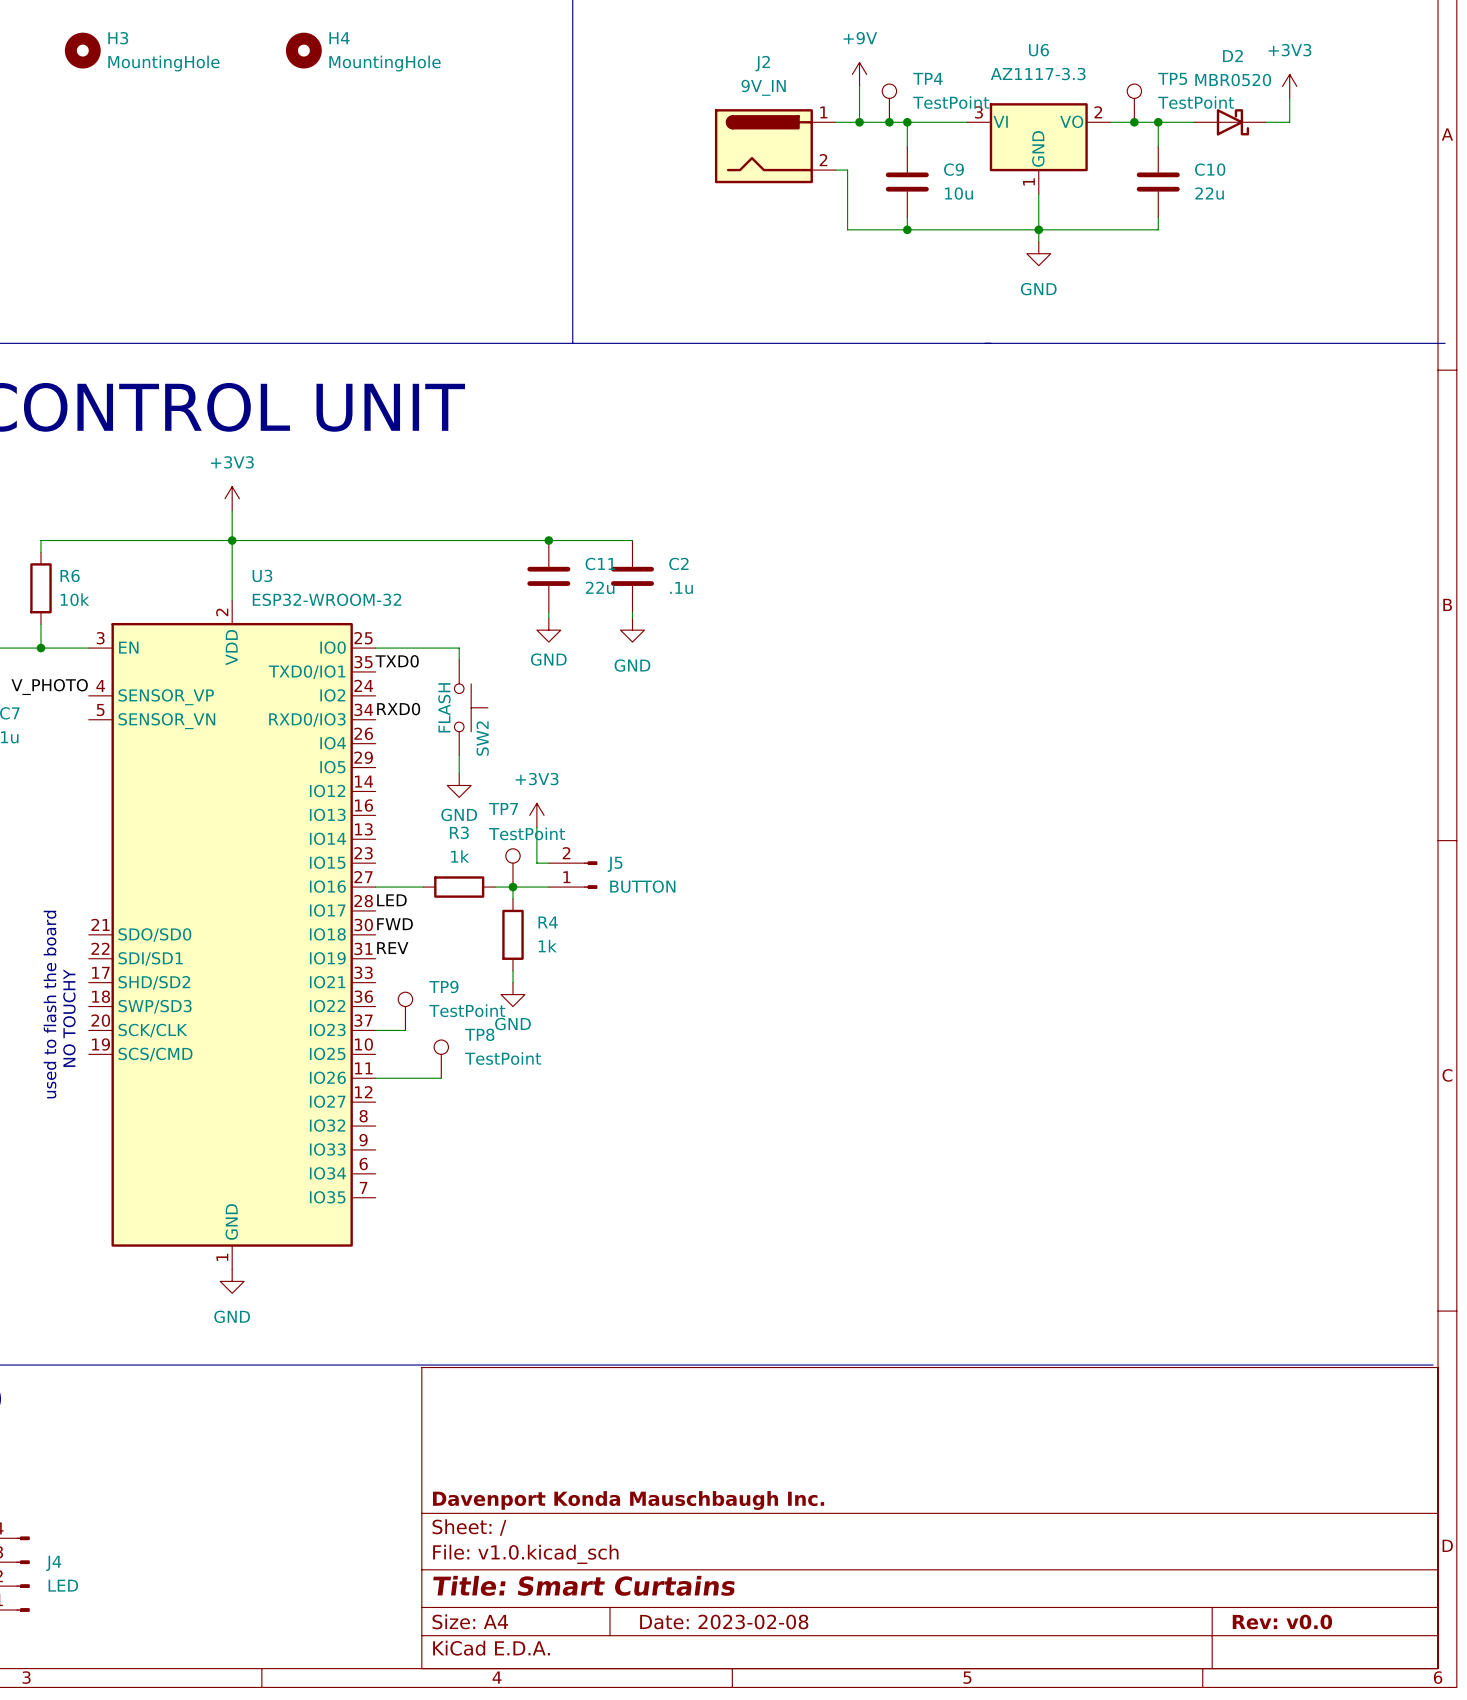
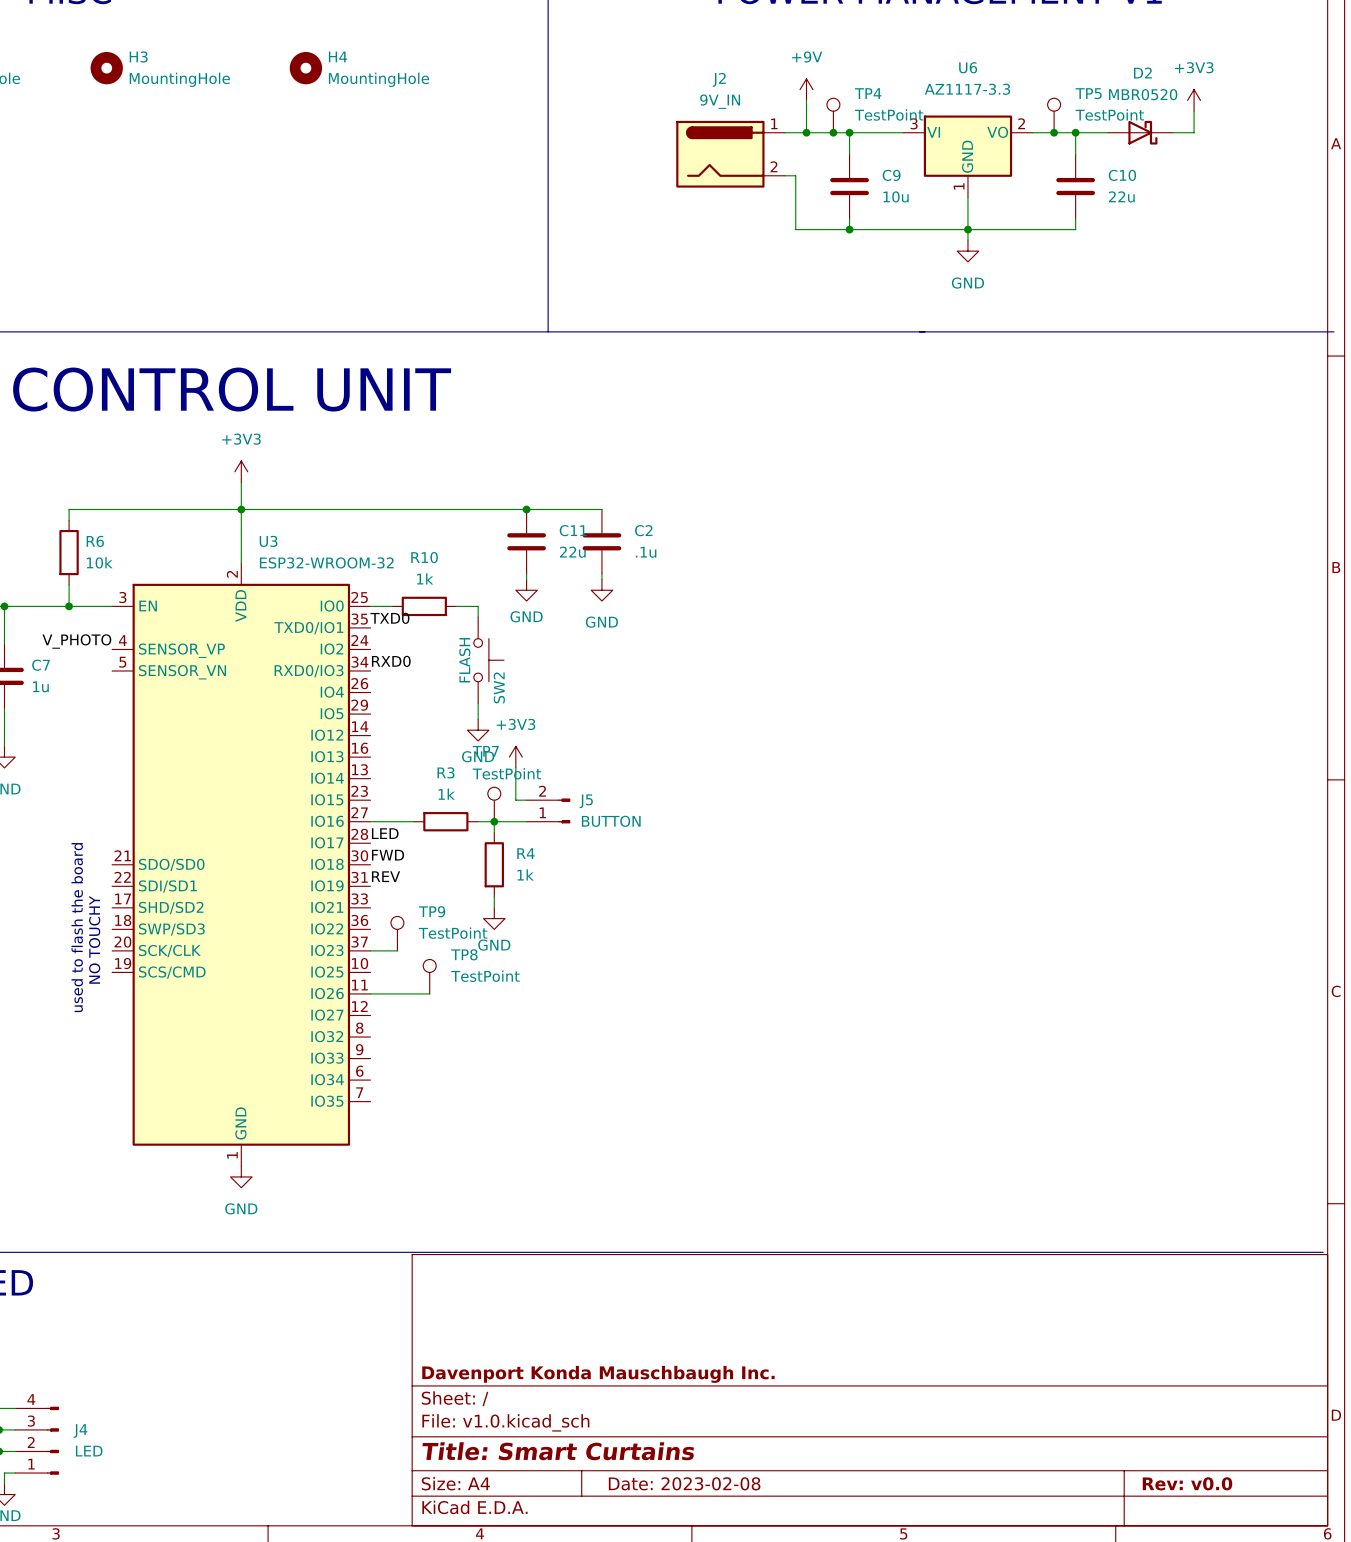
wire: (399, 648) (459, 648) (459, 660) -> none
R10: none -> 1k (424, 606)
wire: none -> (456, 606) (478, 606) (478, 617)
SW2 position: (471, 707) -> (488, 660)
wire: (459, 755) (459, 773) -> (478, 703) (478, 719)
power symbol position: GND (459, 785) -> GND (478, 730)

